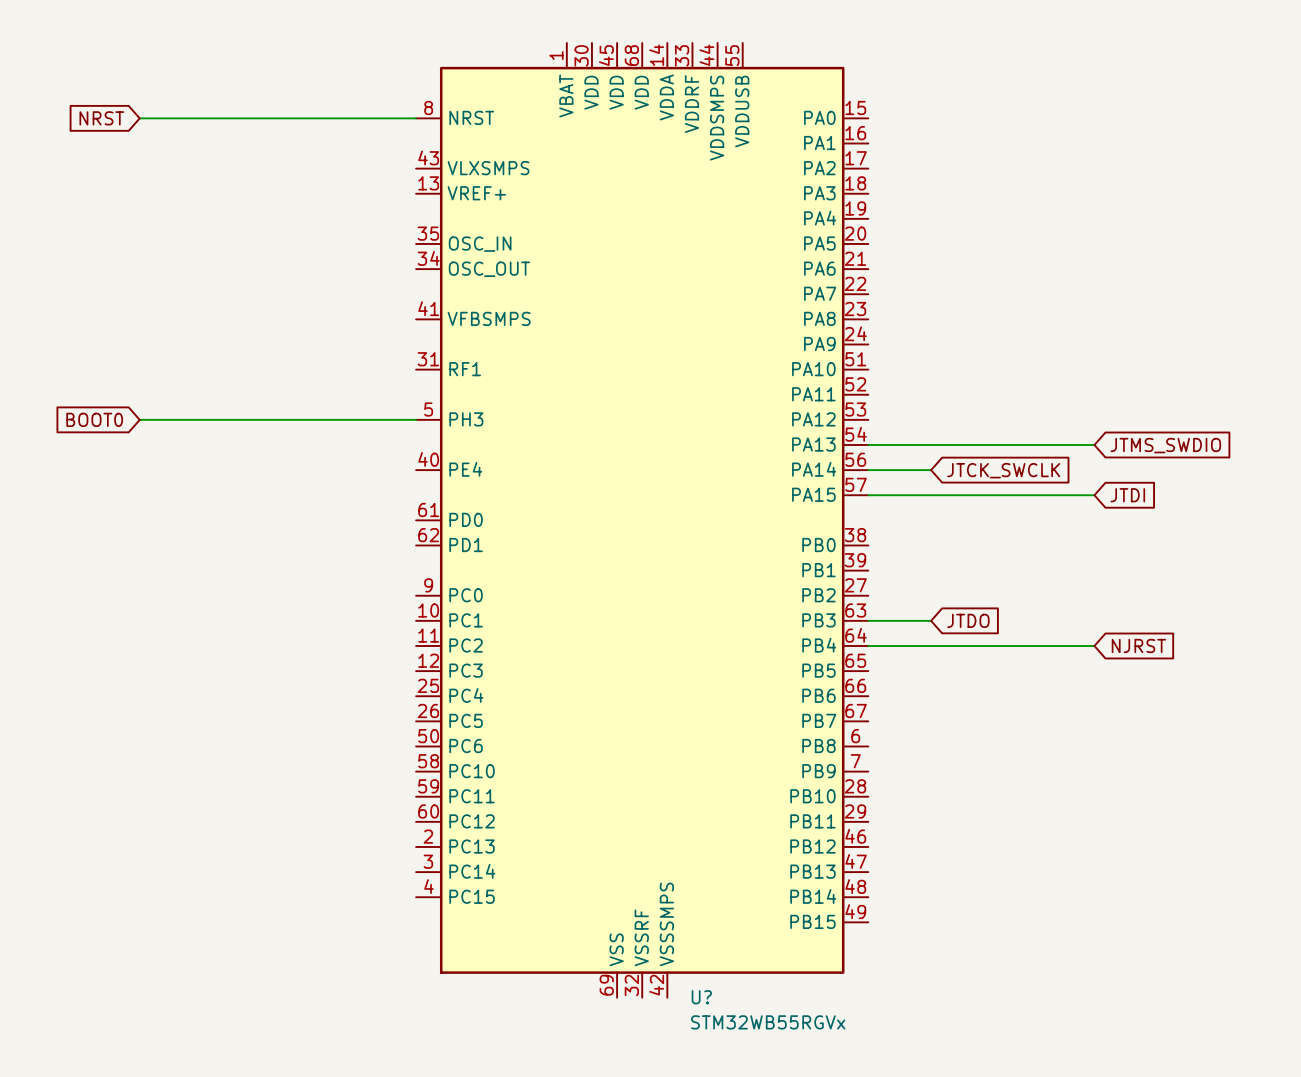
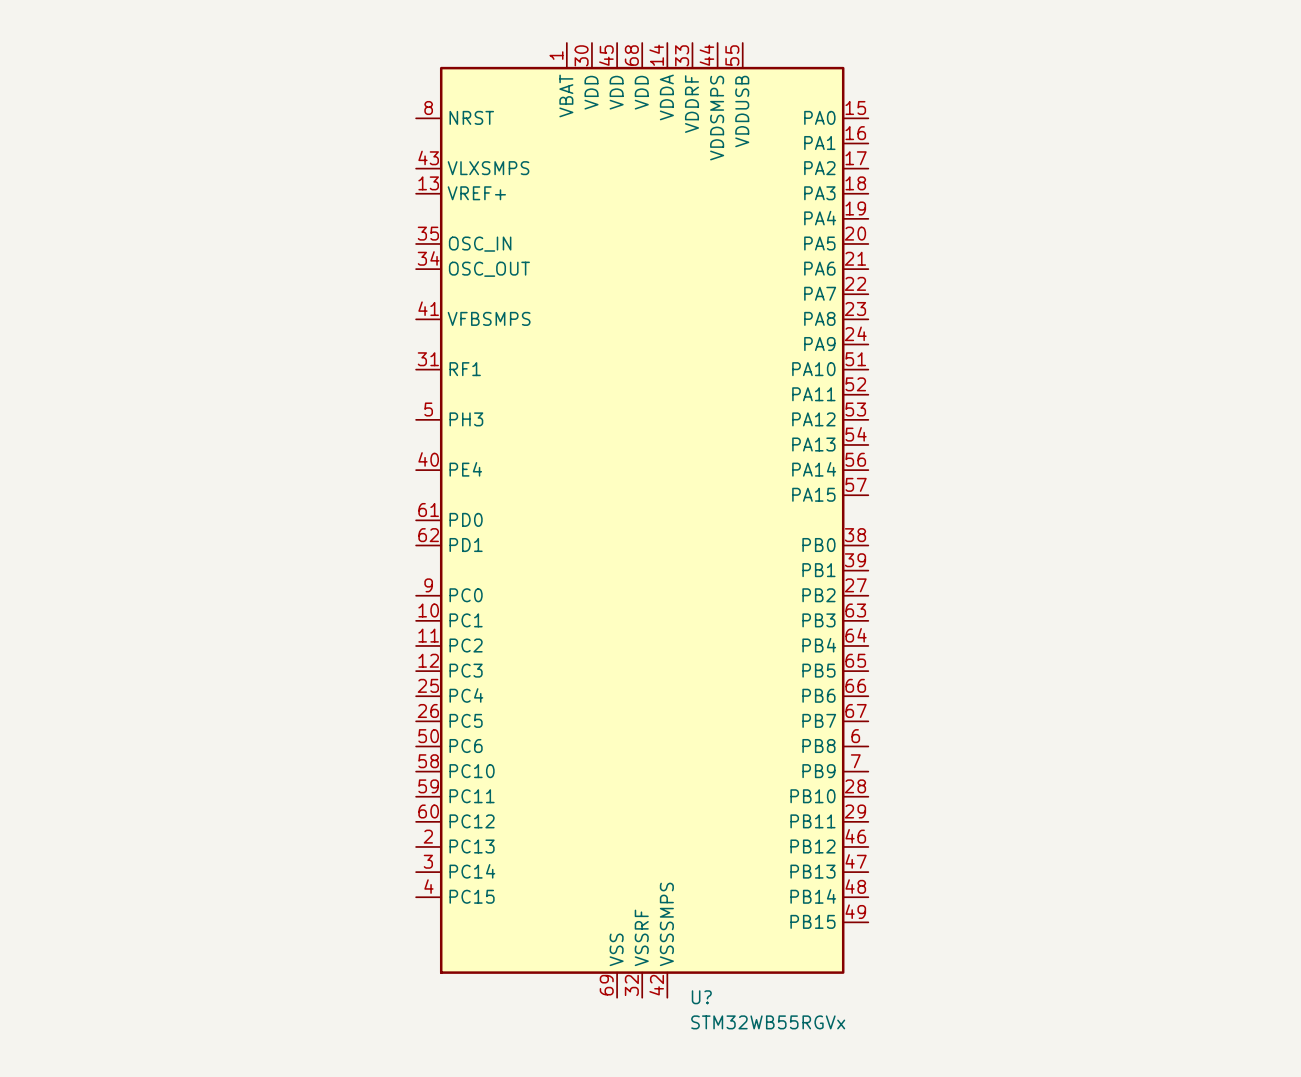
global label: NRST (101, 118) -> none
wire: (139, 118) (416, 118) -> none
global label: BOOT0 (94, 419) -> none
wire: (139, 419) (416, 419) -> none
wire: (868, 444) (1094, 444) -> none
global label: JTMS_SWDIO (1165, 445) -> none
wire: (868, 470) (931, 470) -> none
global label: JTCK_SWCLK (1003, 470) -> none
wire: (868, 495) (1094, 495) -> none
global label: JTDI (1127, 495) -> none
wire: (868, 620) (931, 620) -> none
global label: JTDO (968, 620) -> none
wire: (868, 645) (1094, 645) -> none
global label: NJRST (1138, 645) -> none

